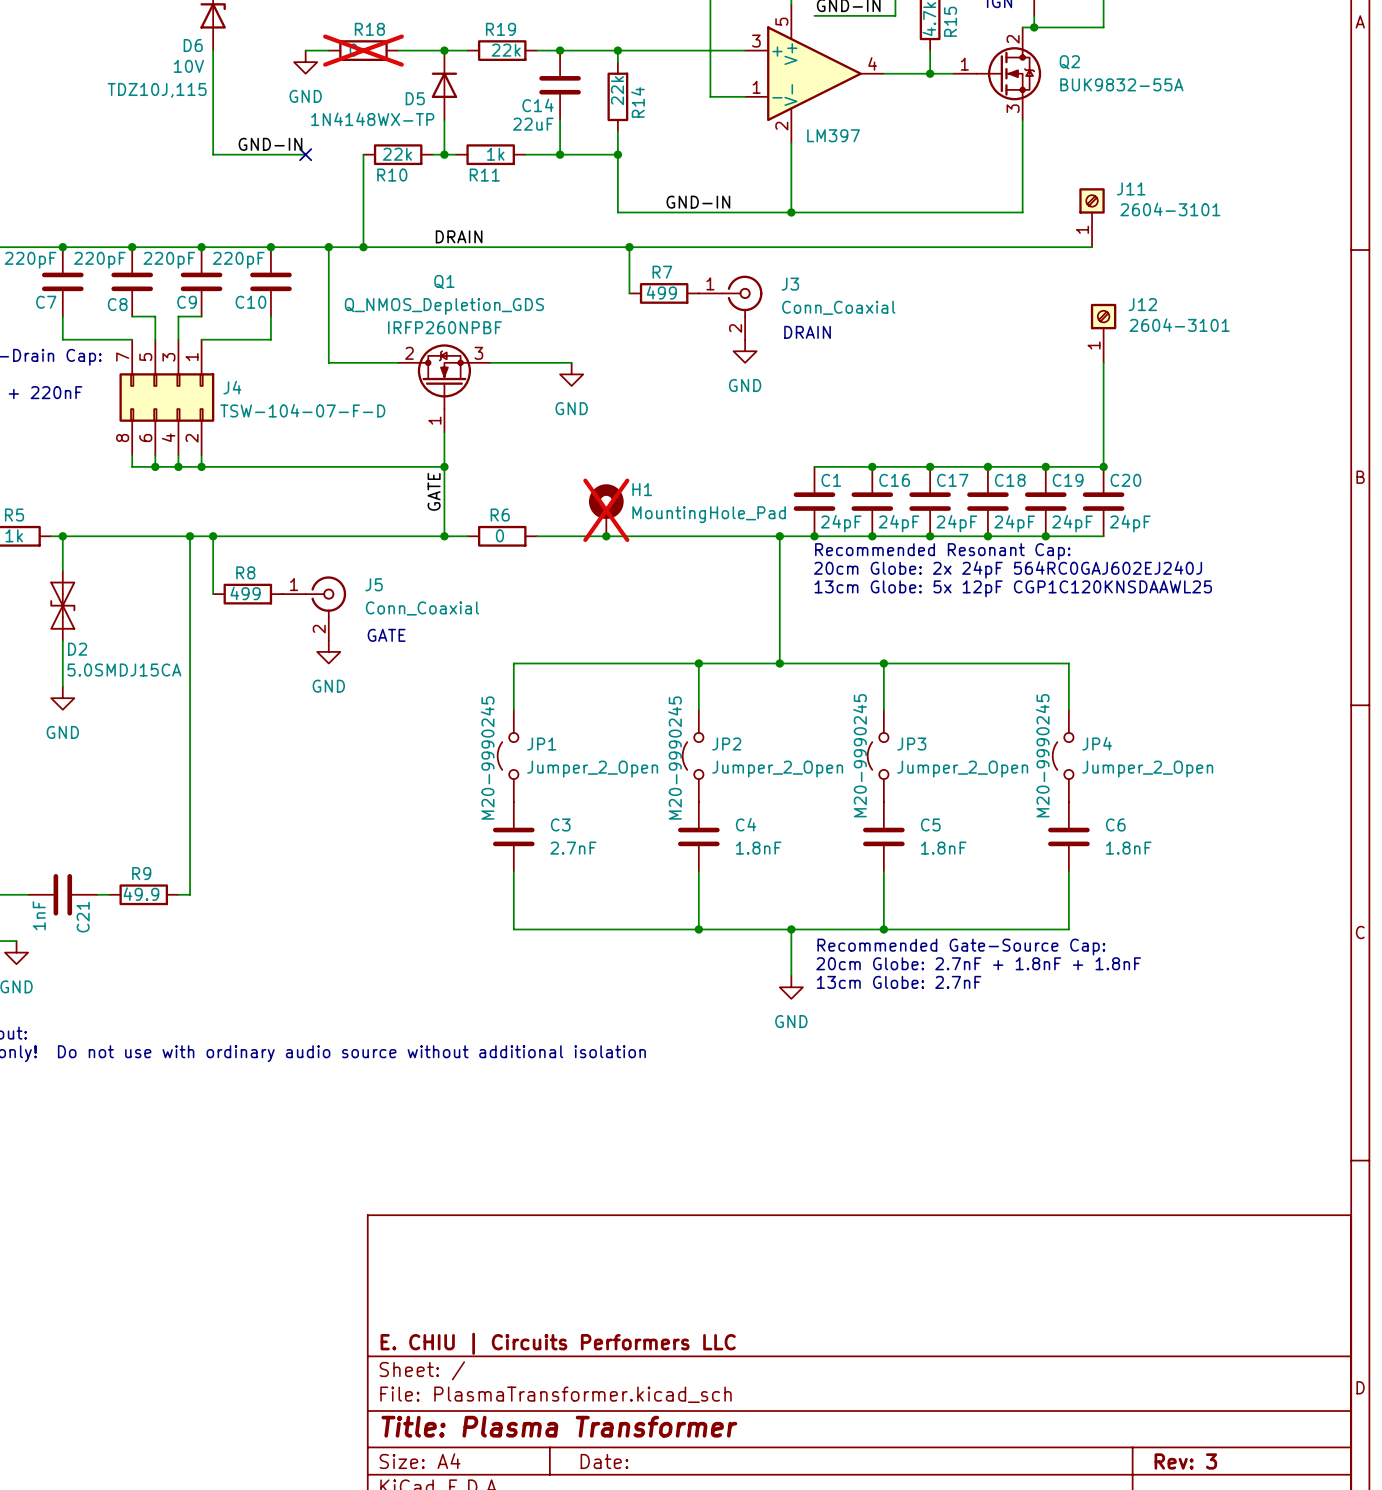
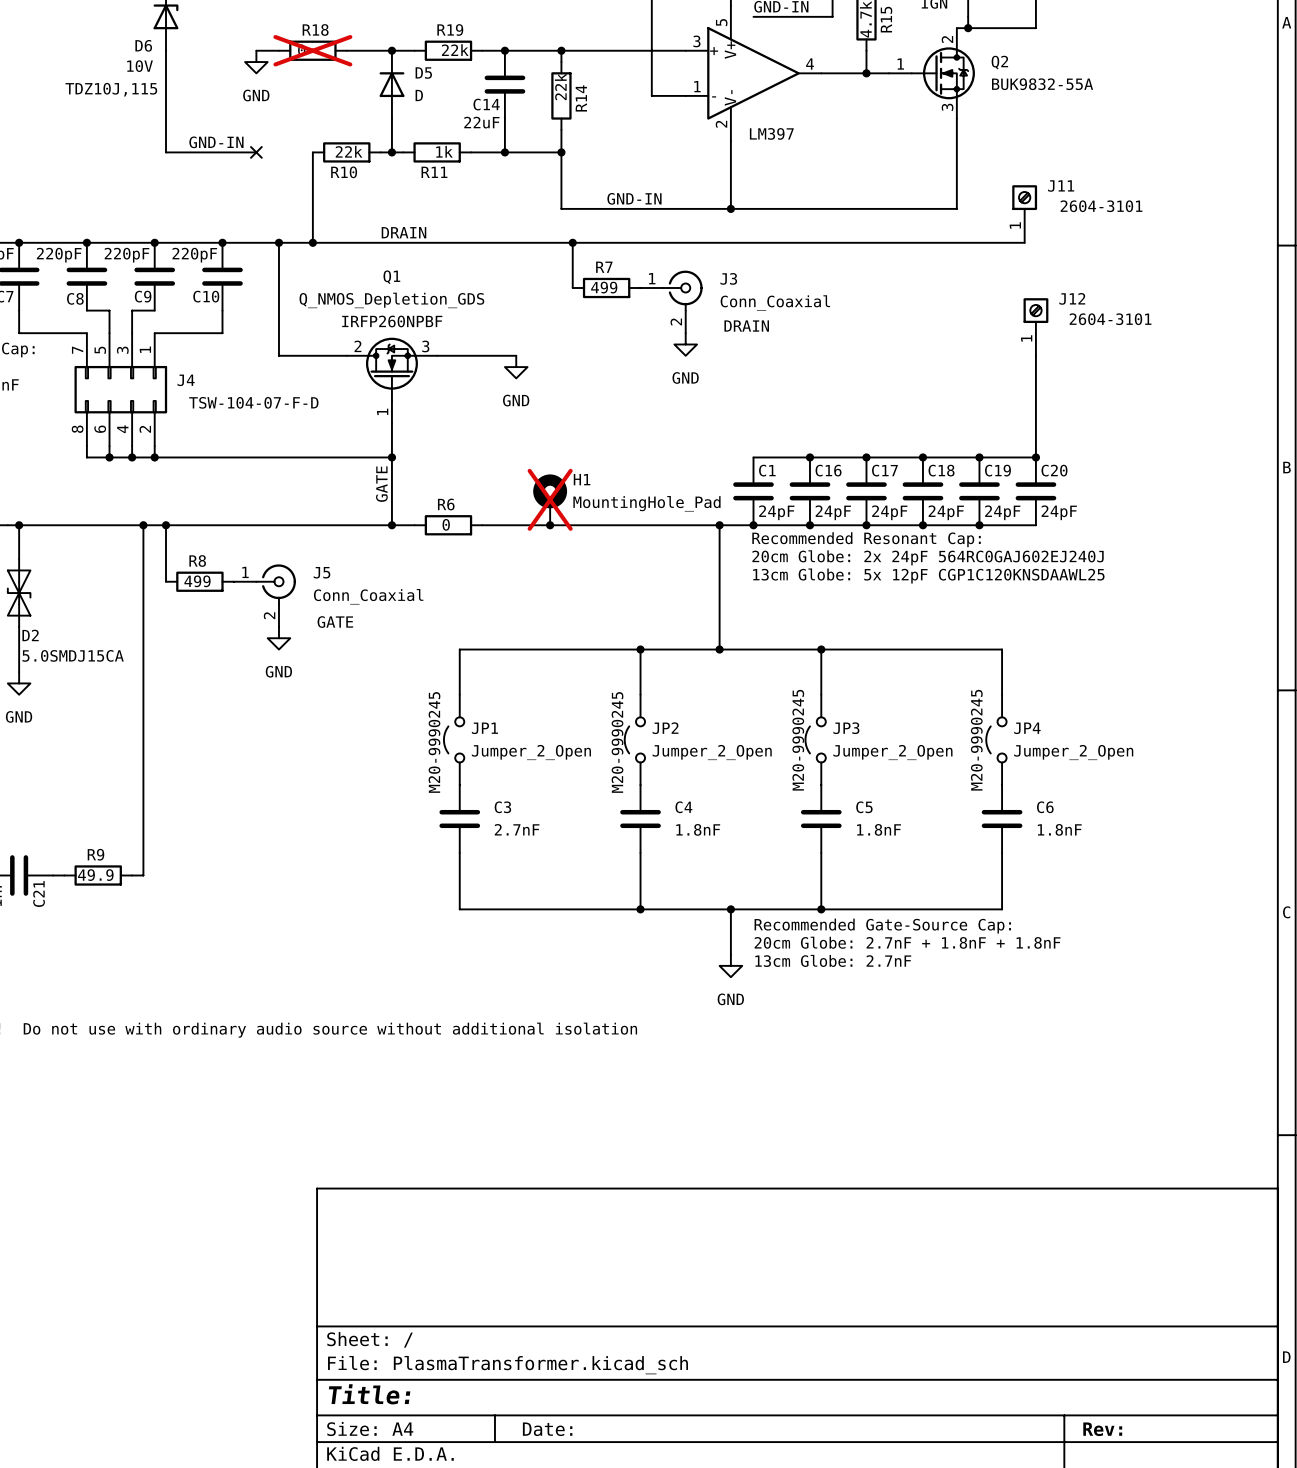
D5 value: none -> D (419, 95)
D5 name position: D5 (415, 98) -> D5 (423, 73)
D5 text: 1N4148WX-TP (372, 119) -> none
title block: E. CHIU | Circuits Performers LLC (558, 1343) -> none
title block: Title: Plasma Transformer (559, 1426) -> Title: (369, 1394)
title block: Rev: 3 (1185, 1461) -> Rev: (1102, 1429)

